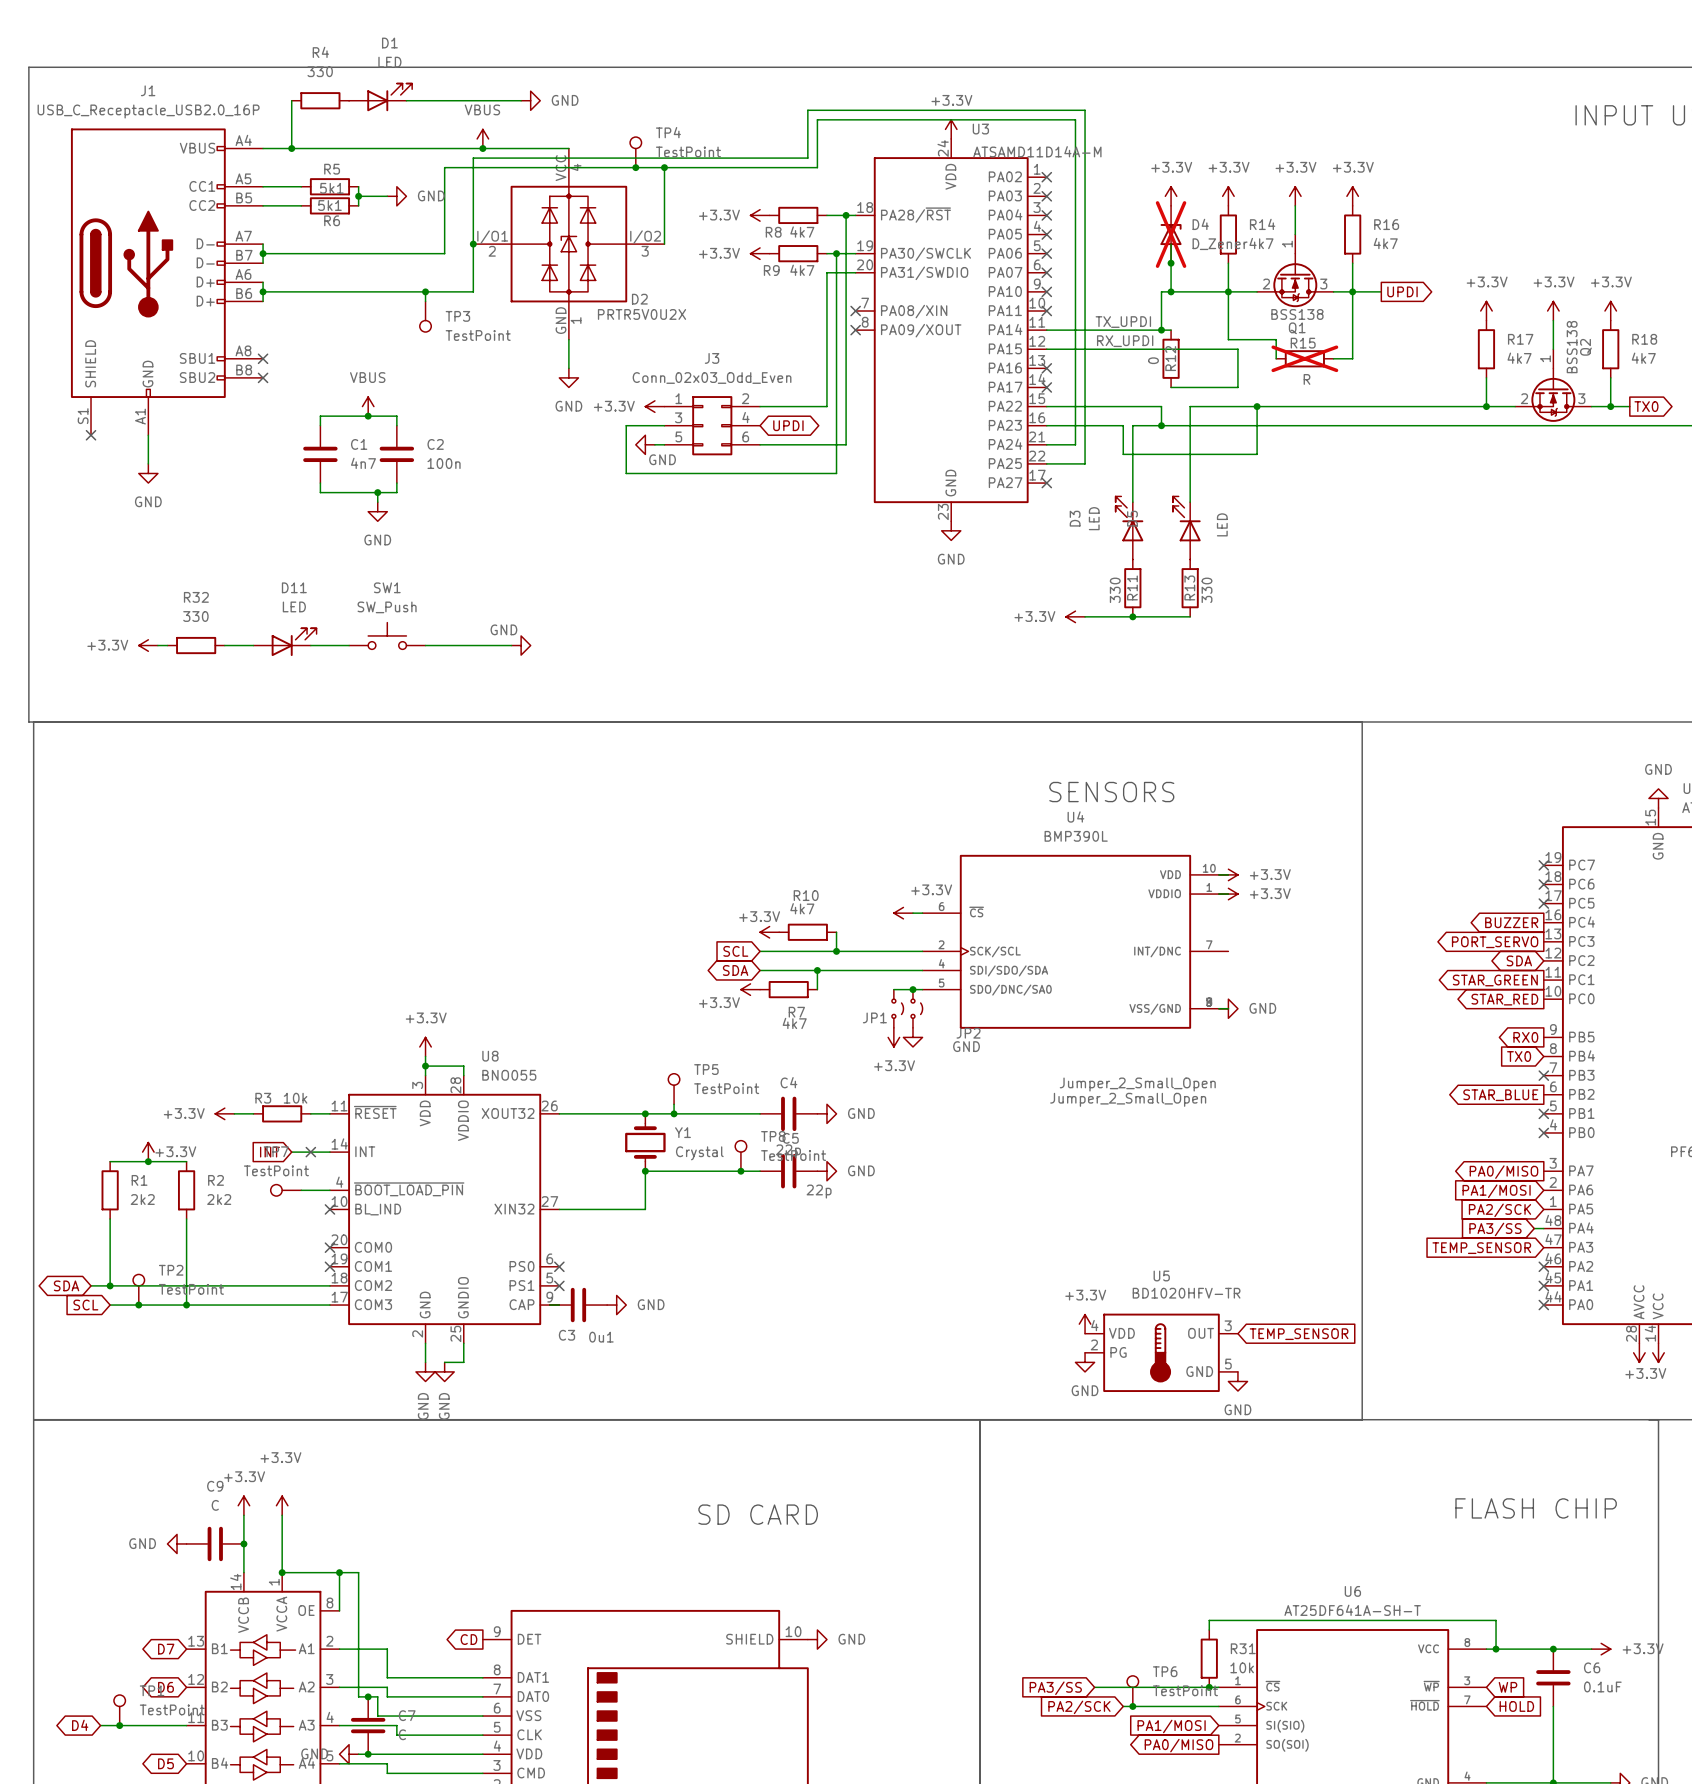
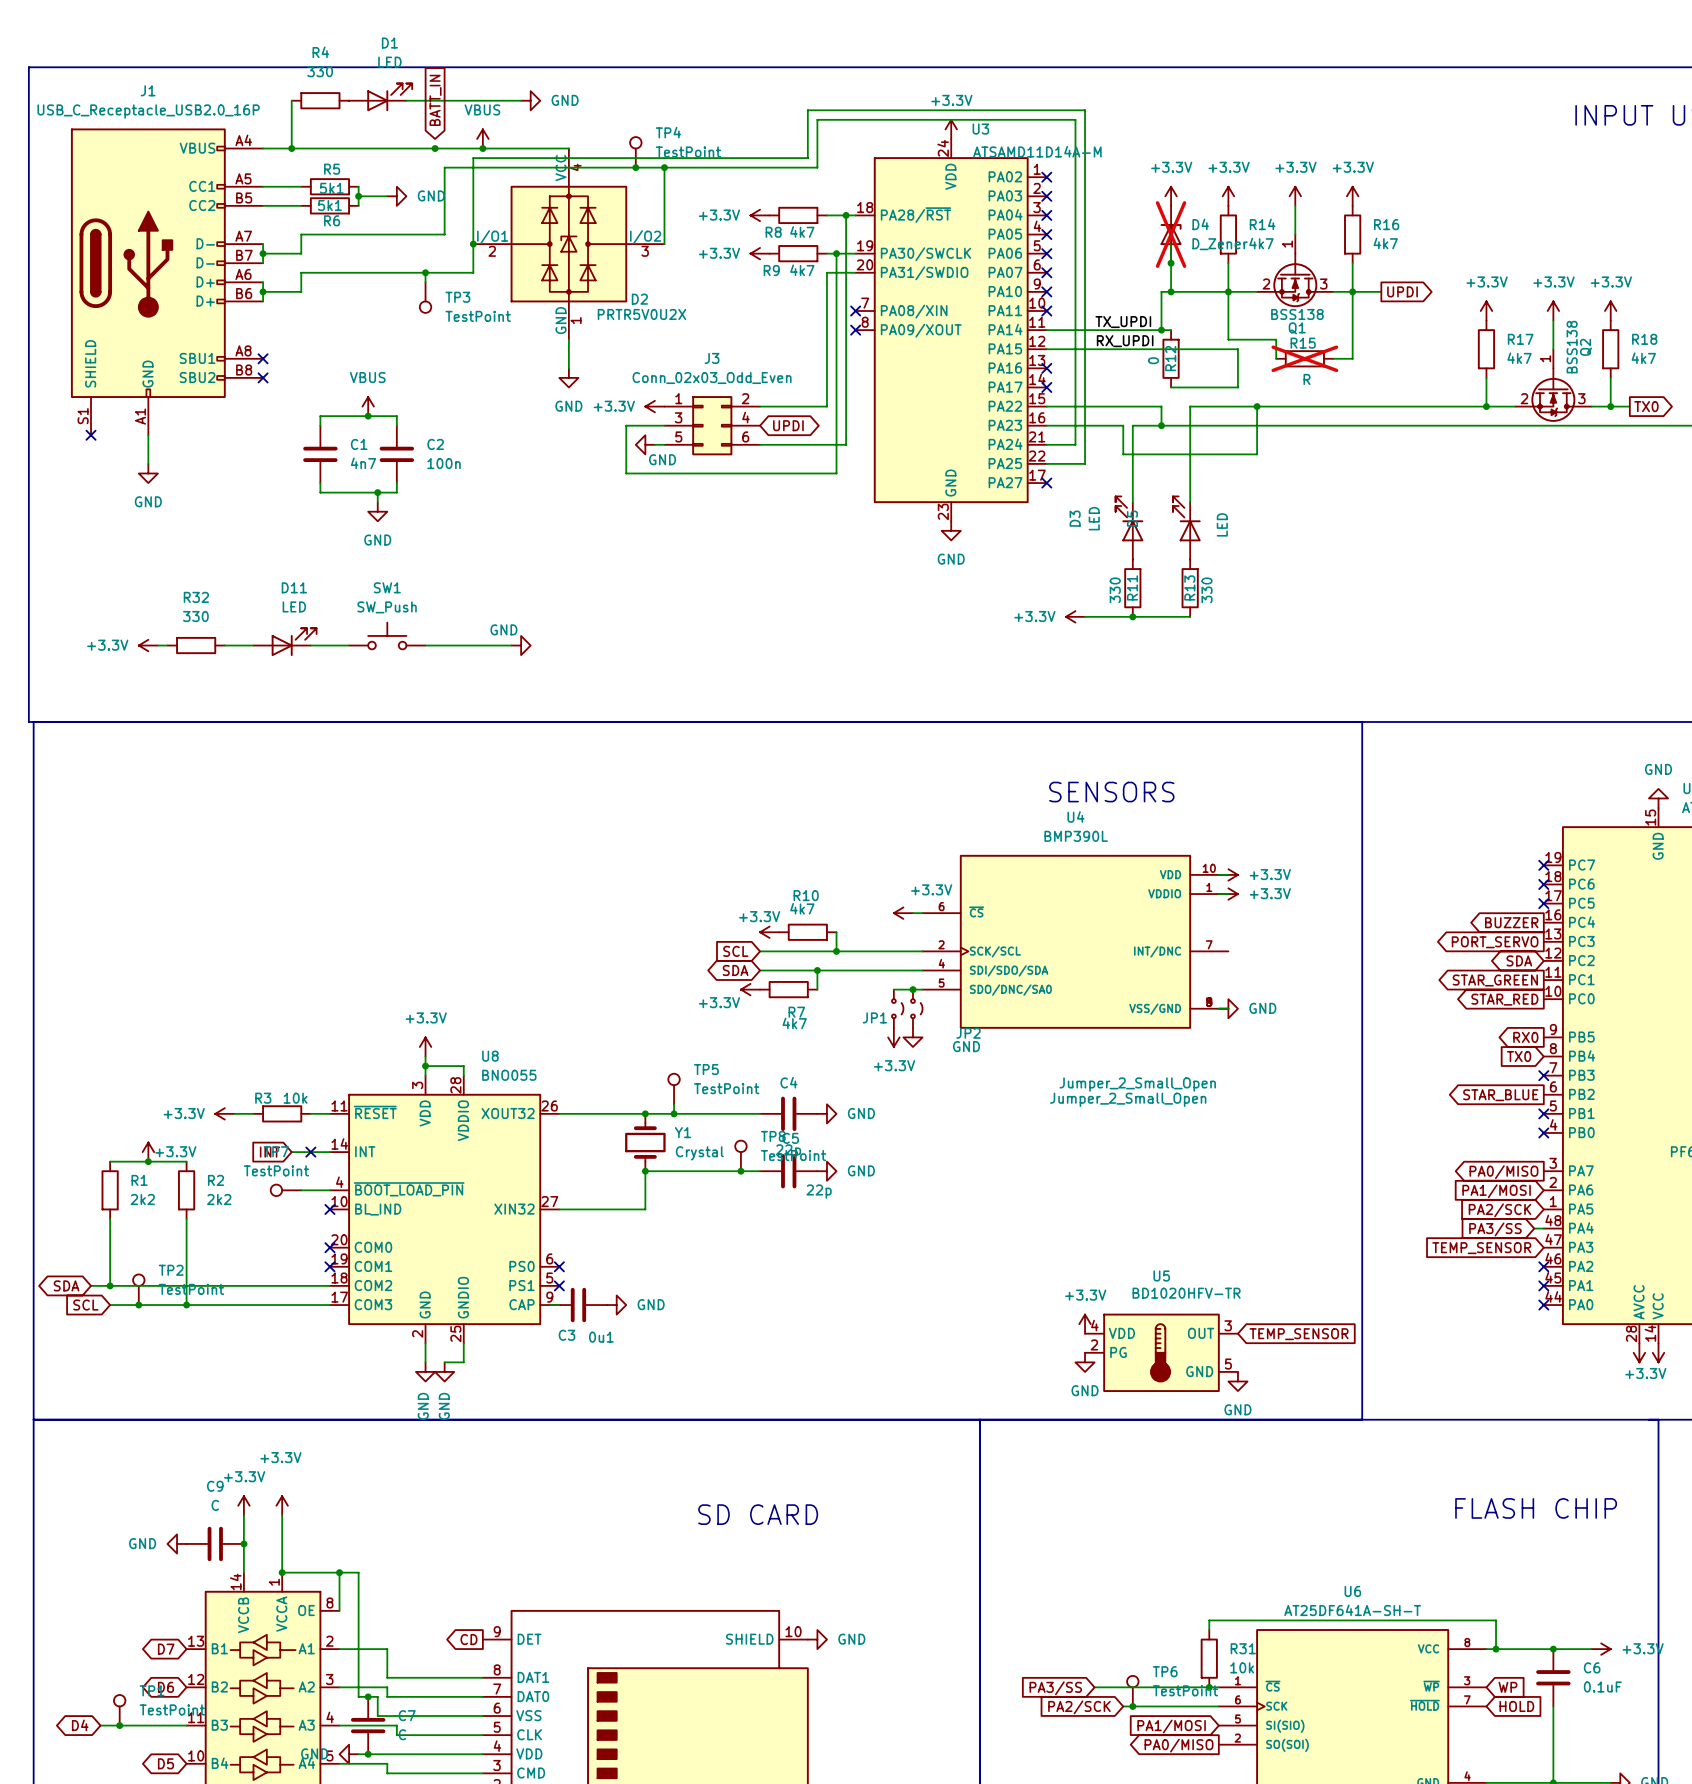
global label: none -> BATT_IN (435, 100)
junction: none -> (435, 148)
wire: (444, 234) (444, 253) (301, 253) -> (444, 234) (301, 234) (301, 253)
wire: (473, 272) (473, 291) (301, 291) -> (473, 272) (301, 272) (301, 291)
junction position: (425, 291) -> (425, 272)
TP3 position: (425, 316) -> (425, 297)

